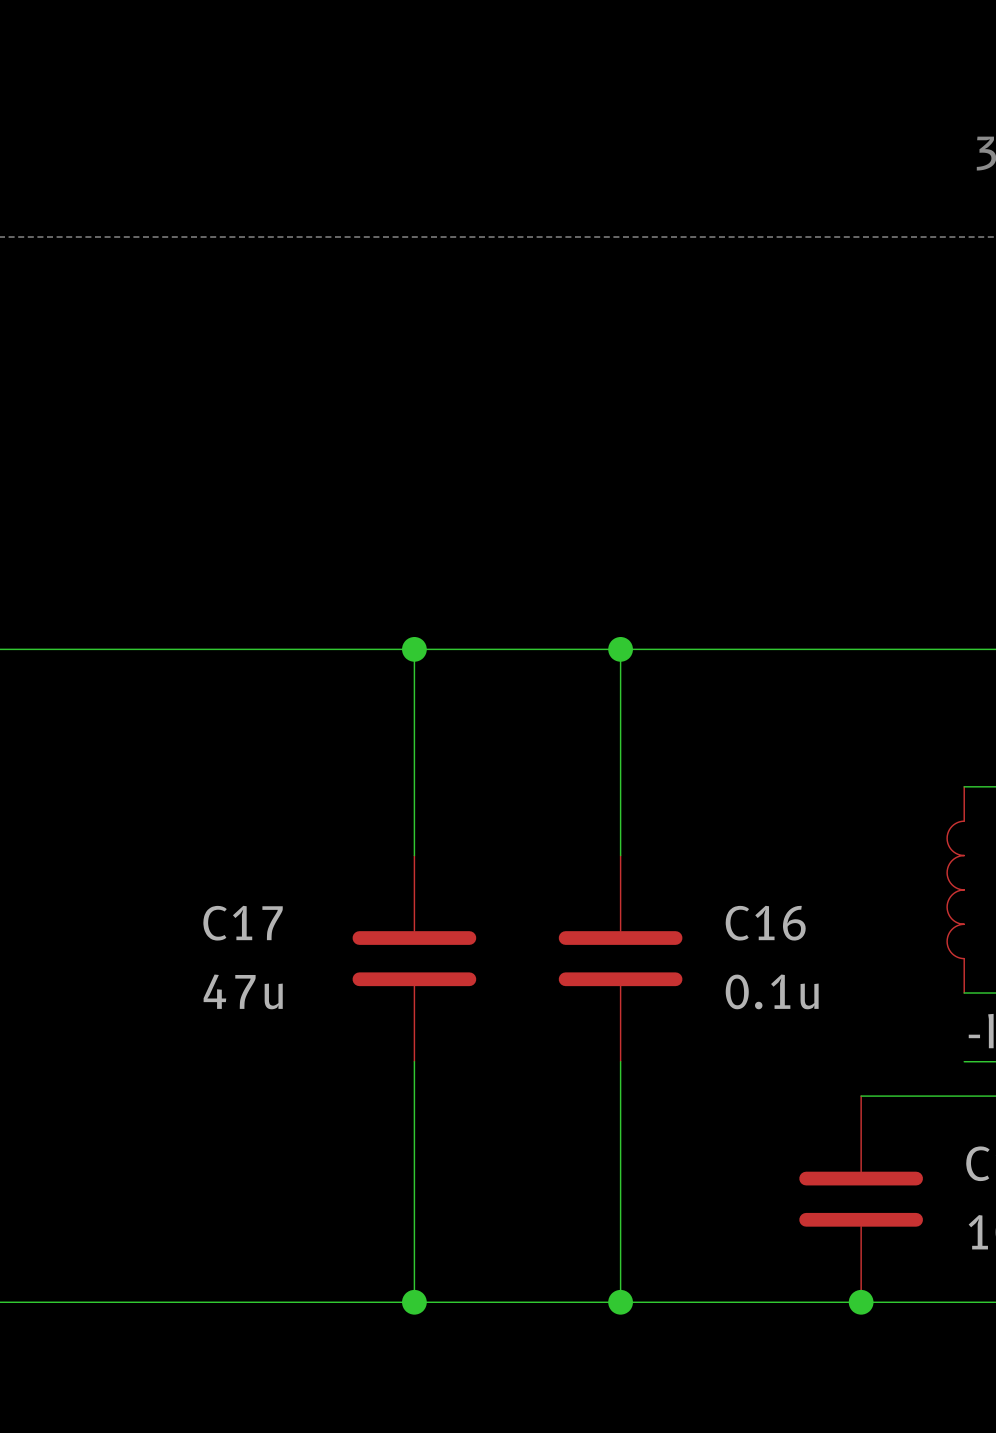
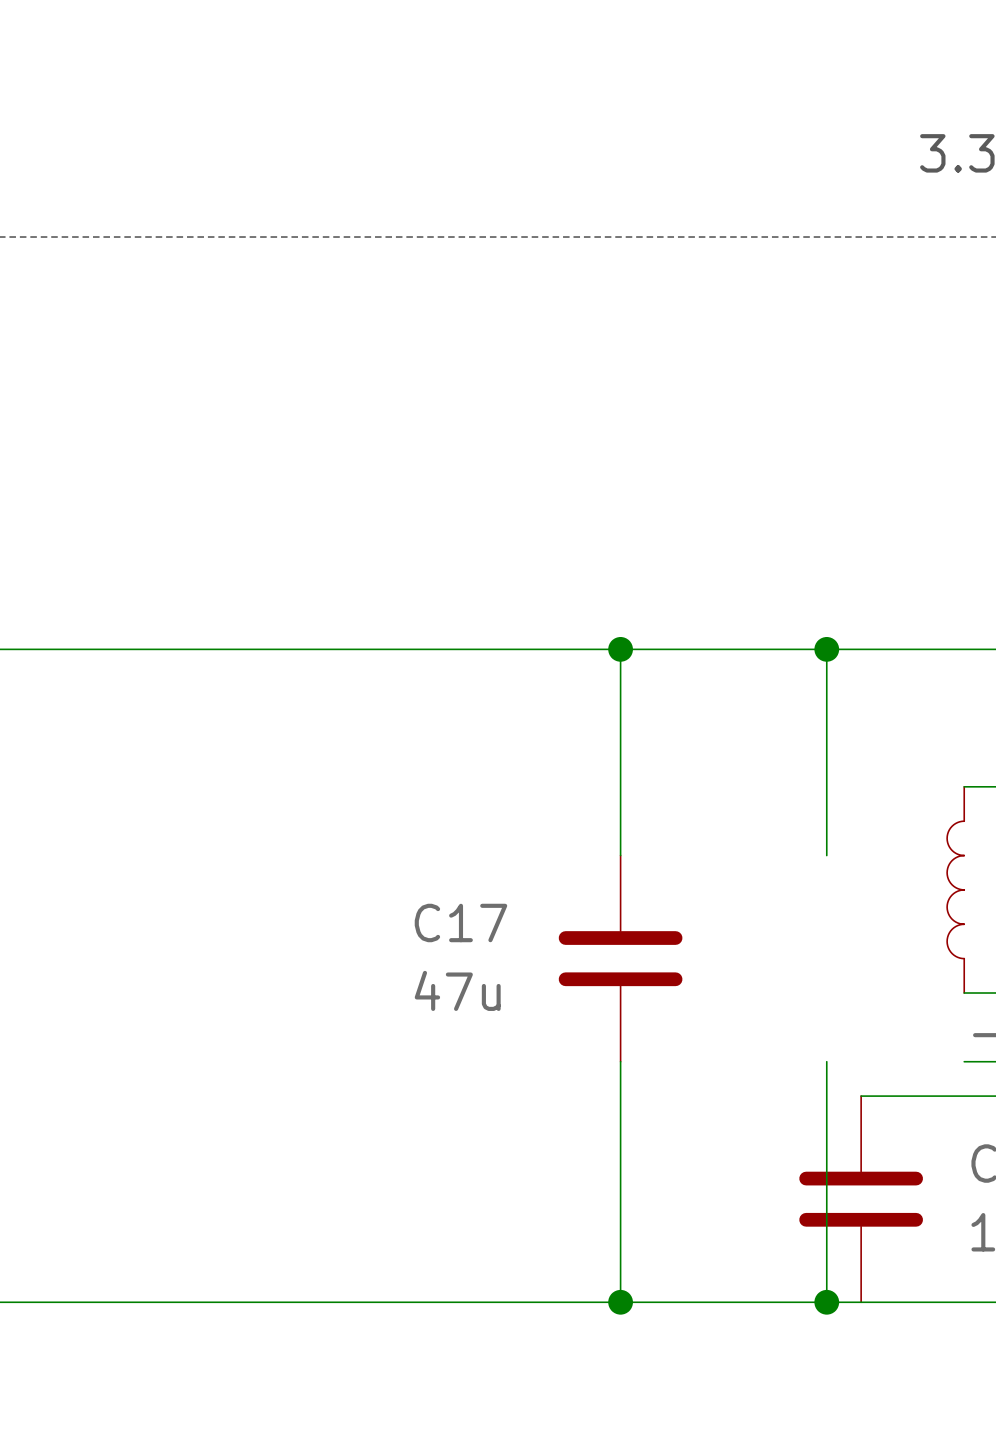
wire: (414, 649) (414, 855) -> (826, 649) (826, 855)
junction: (414, 649) -> none
junction: none -> (826, 649)
C16 name: C16 (765, 923) -> C17 (460, 922)
C17: 47u (414, 958) -> none
C16 value: 0.1u (772, 991) -> 47u (457, 990)
wire: (414, 1061) (414, 1302) -> (826, 1061) (826, 1302)
junction: (414, 1302) -> none
junction position: (861, 1302) -> (826, 1302)

